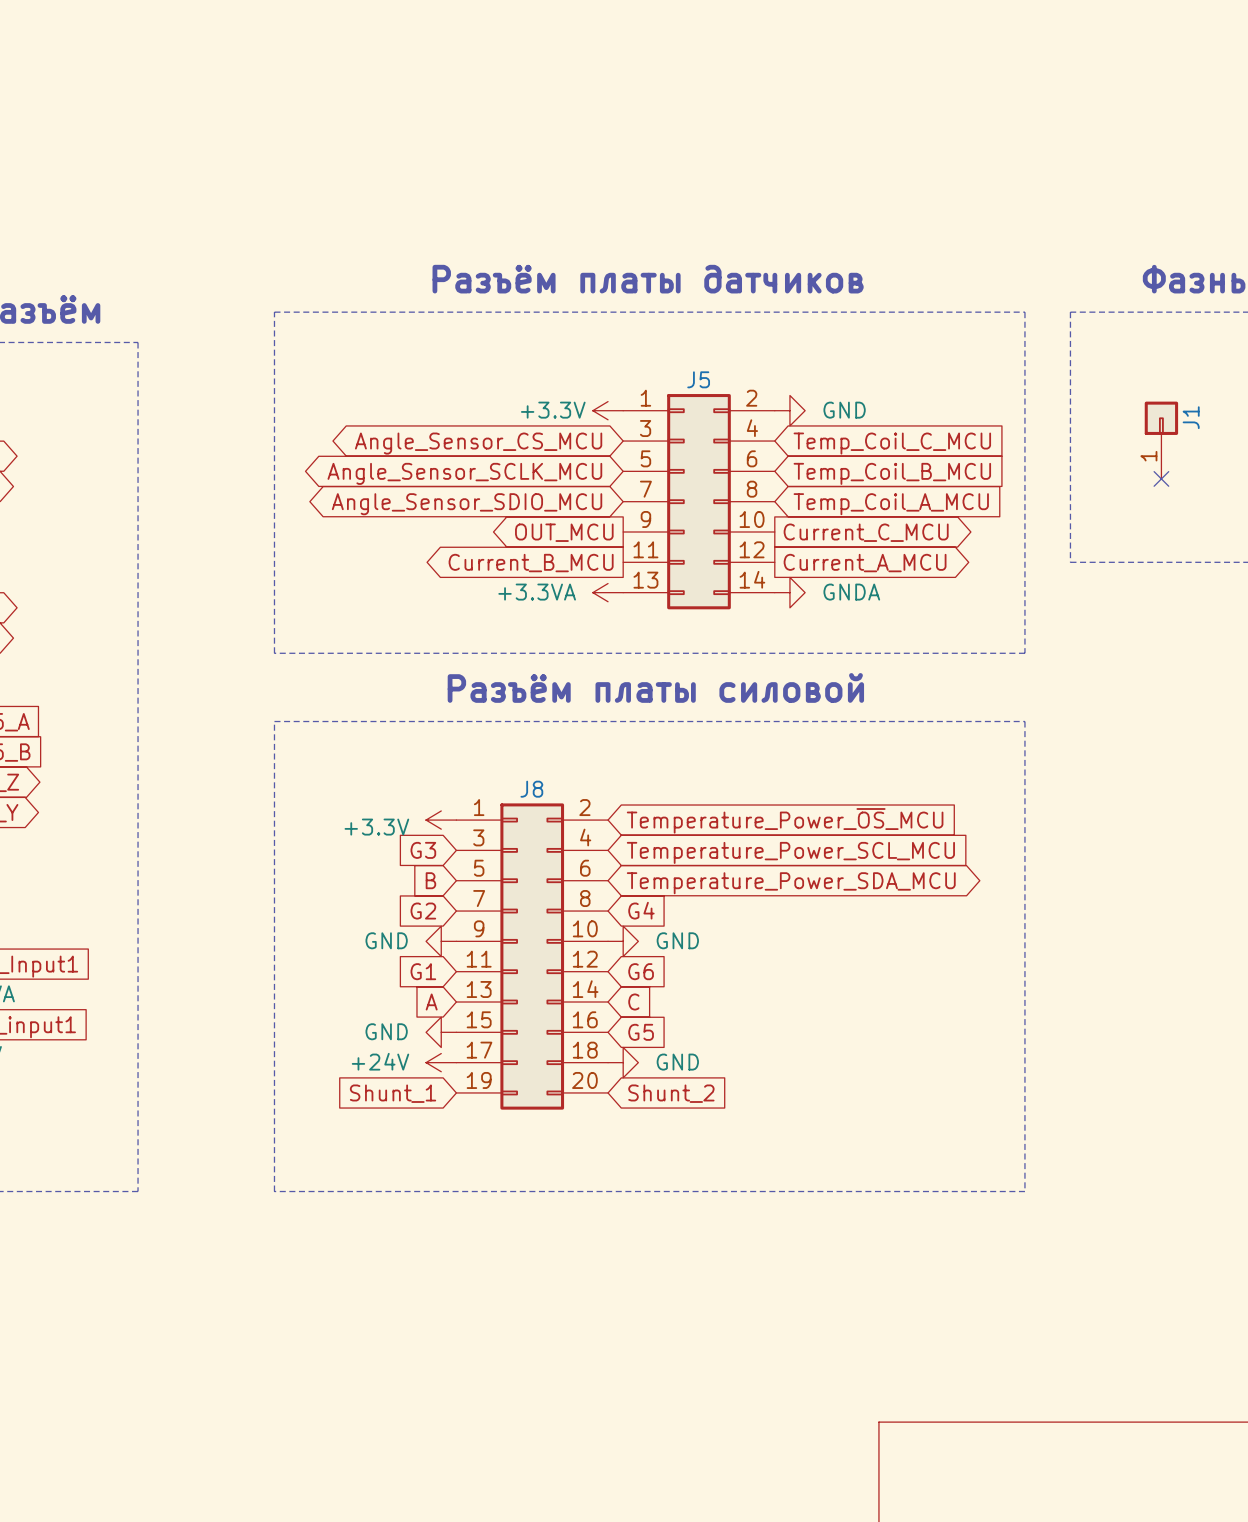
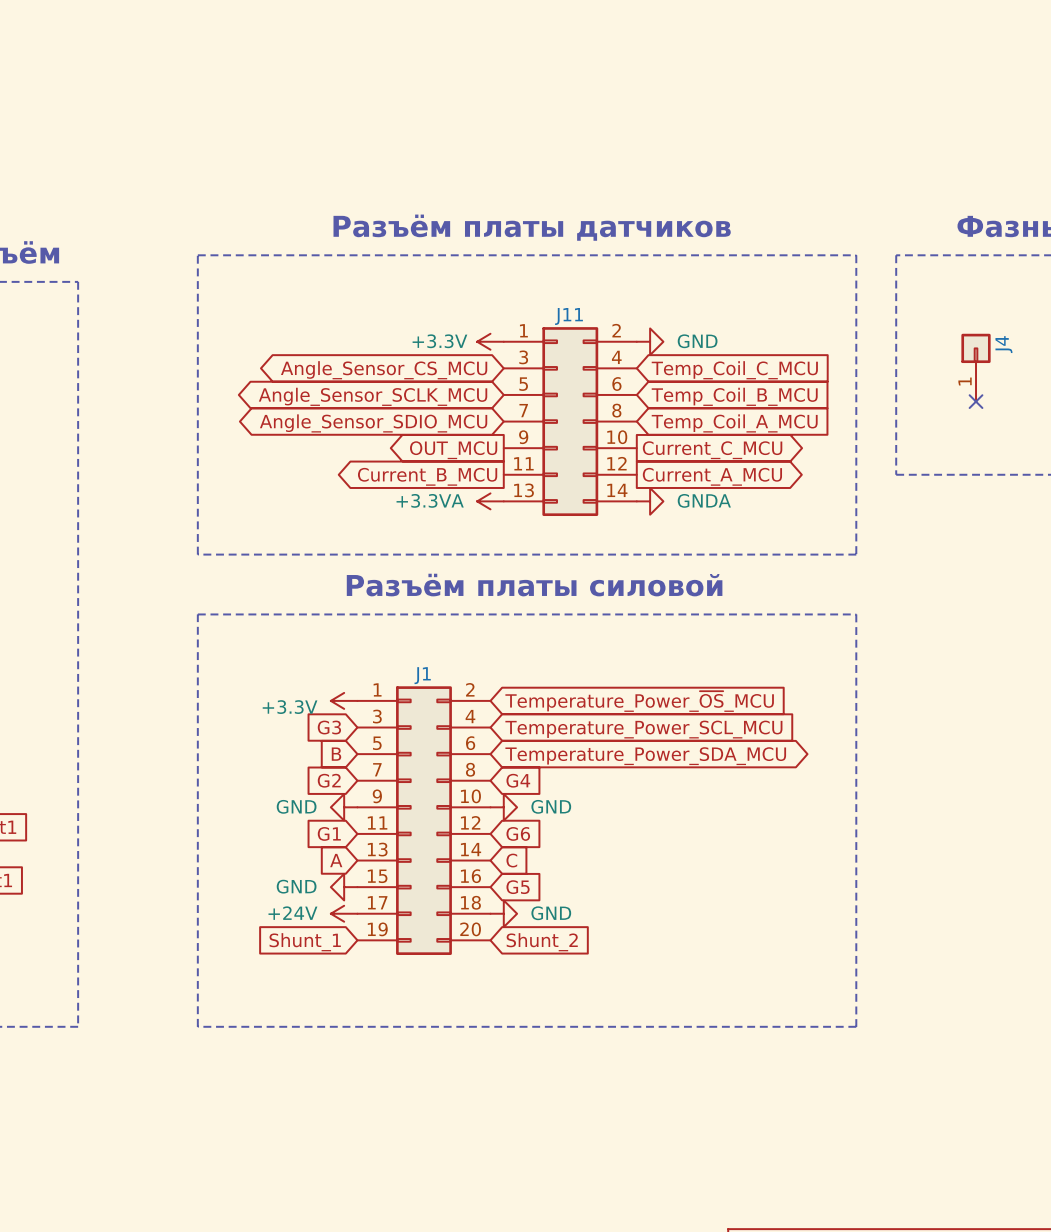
J5 name: J5 (698, 379) -> J11 (568, 316)
J1 name: J1 (1191, 417) -> J4 (1003, 344)
J8 name: J8 (531, 789) -> J1 (422, 675)

